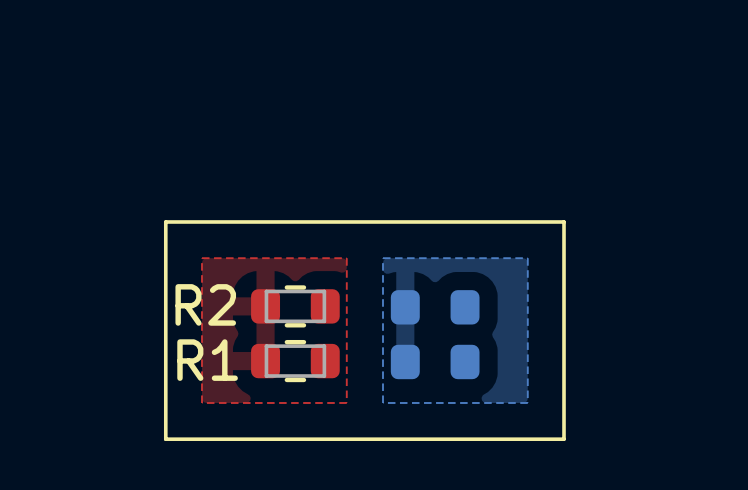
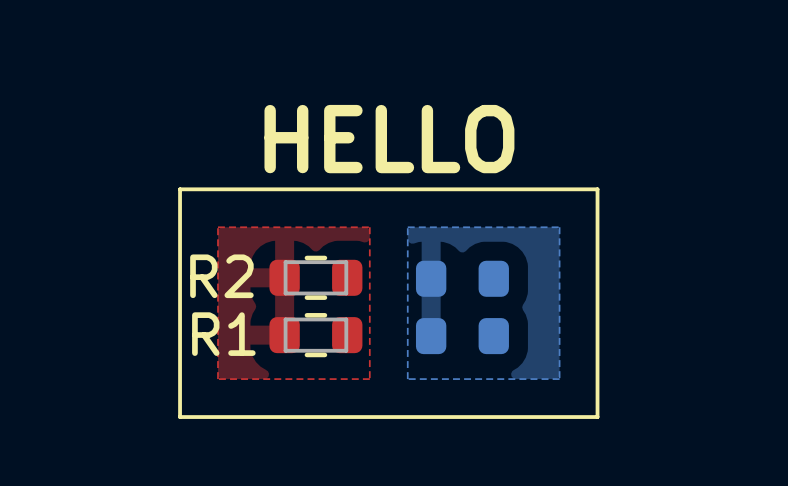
text: none -> HELLO (389, 139)

